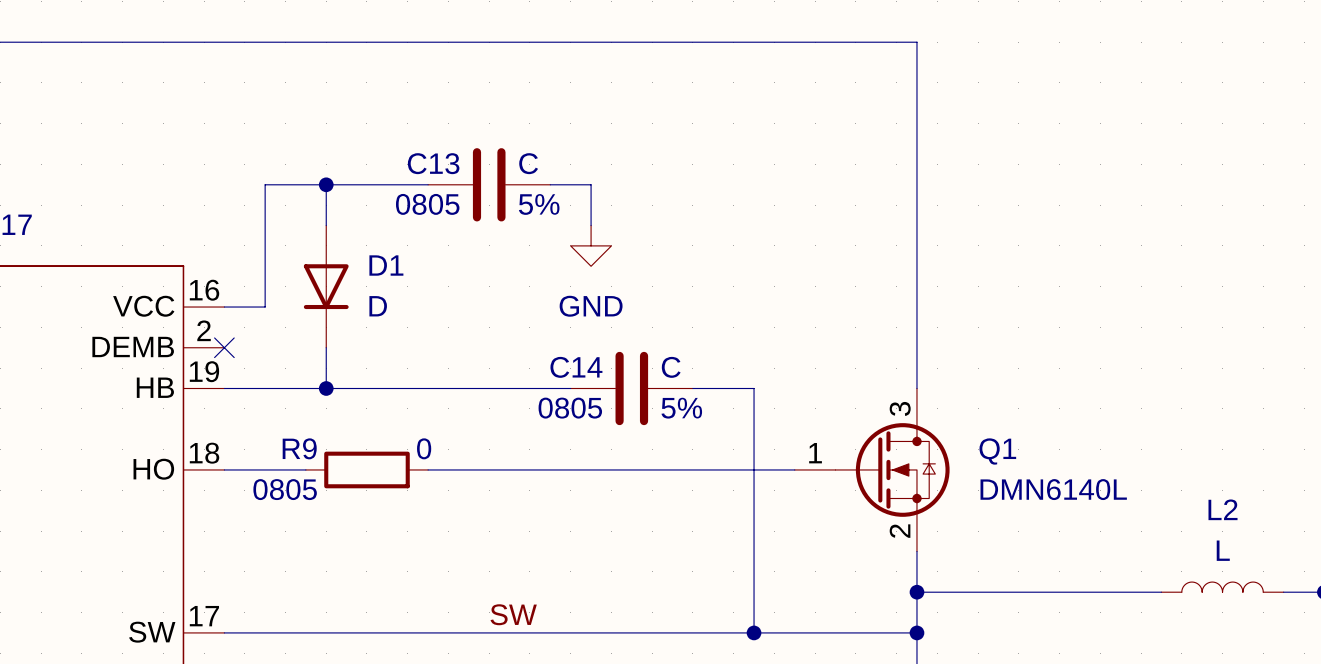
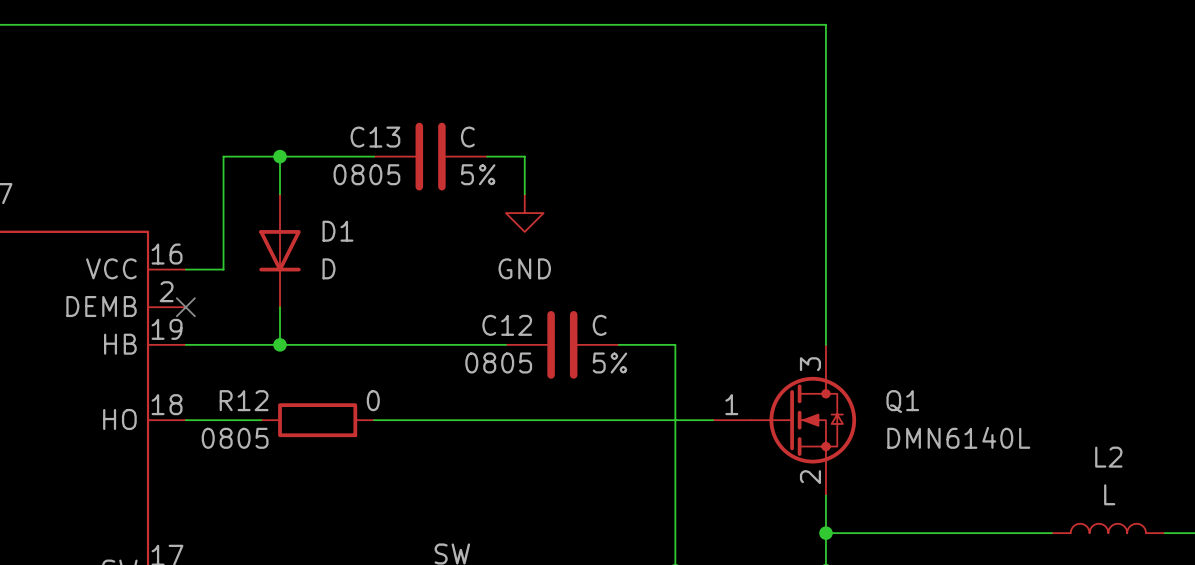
C14 name: C14 (576, 367) -> C12 (507, 325)
R9 name: R9 (299, 448) -> R12 (244, 400)

